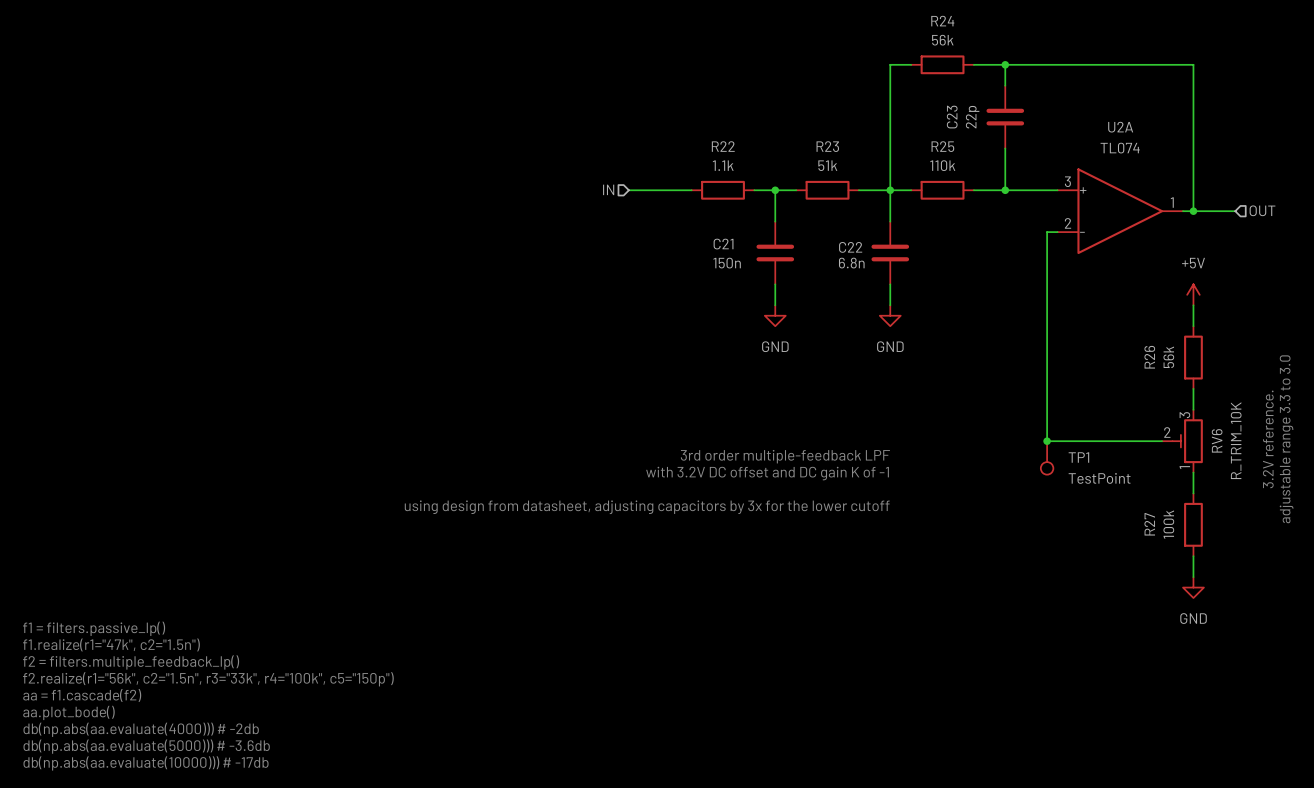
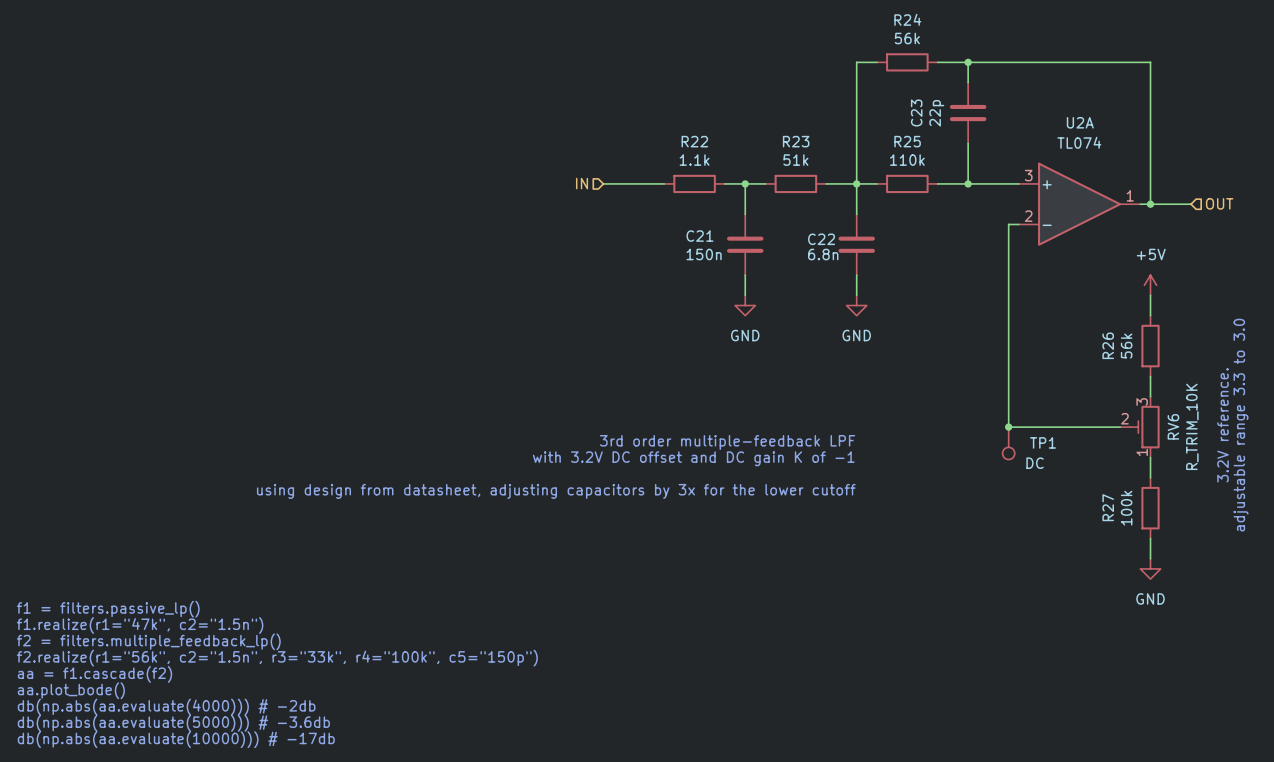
TP1 value: TestPoint (1099, 478) -> DC (1035, 463)

